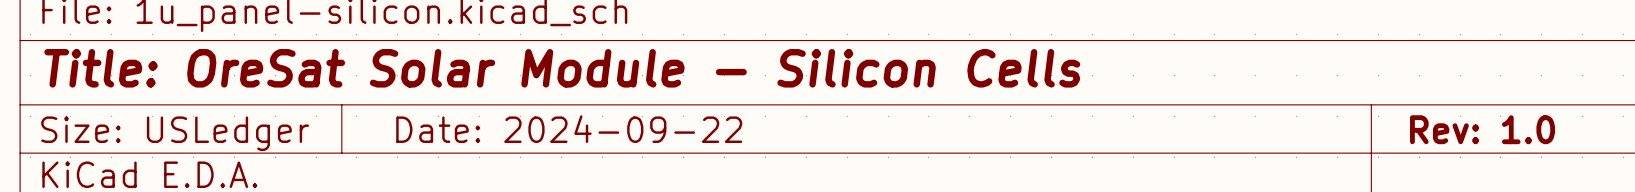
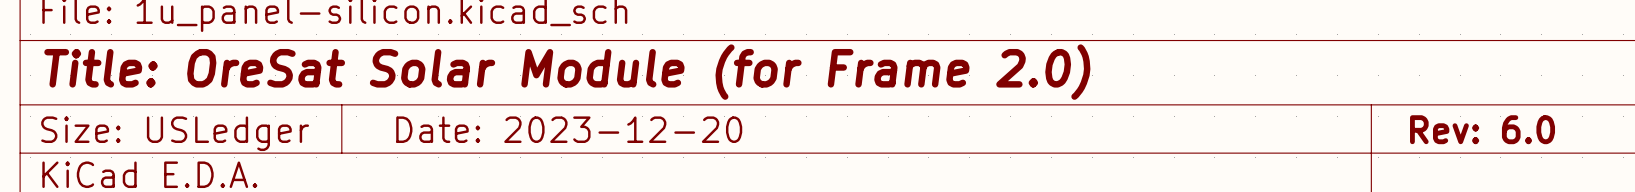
title block: Title: OreSat Solar Module - Silicon Cells (562, 68) -> Title: OreSat Solar Module (for Frame 2.0) (567, 72)
title block: Date: 2024-09-22 (569, 129) -> Date: 2023-12-20 (569, 129)
title block: Rev: 1.0 (1482, 129) -> Rev: 6.0 (1482, 129)

